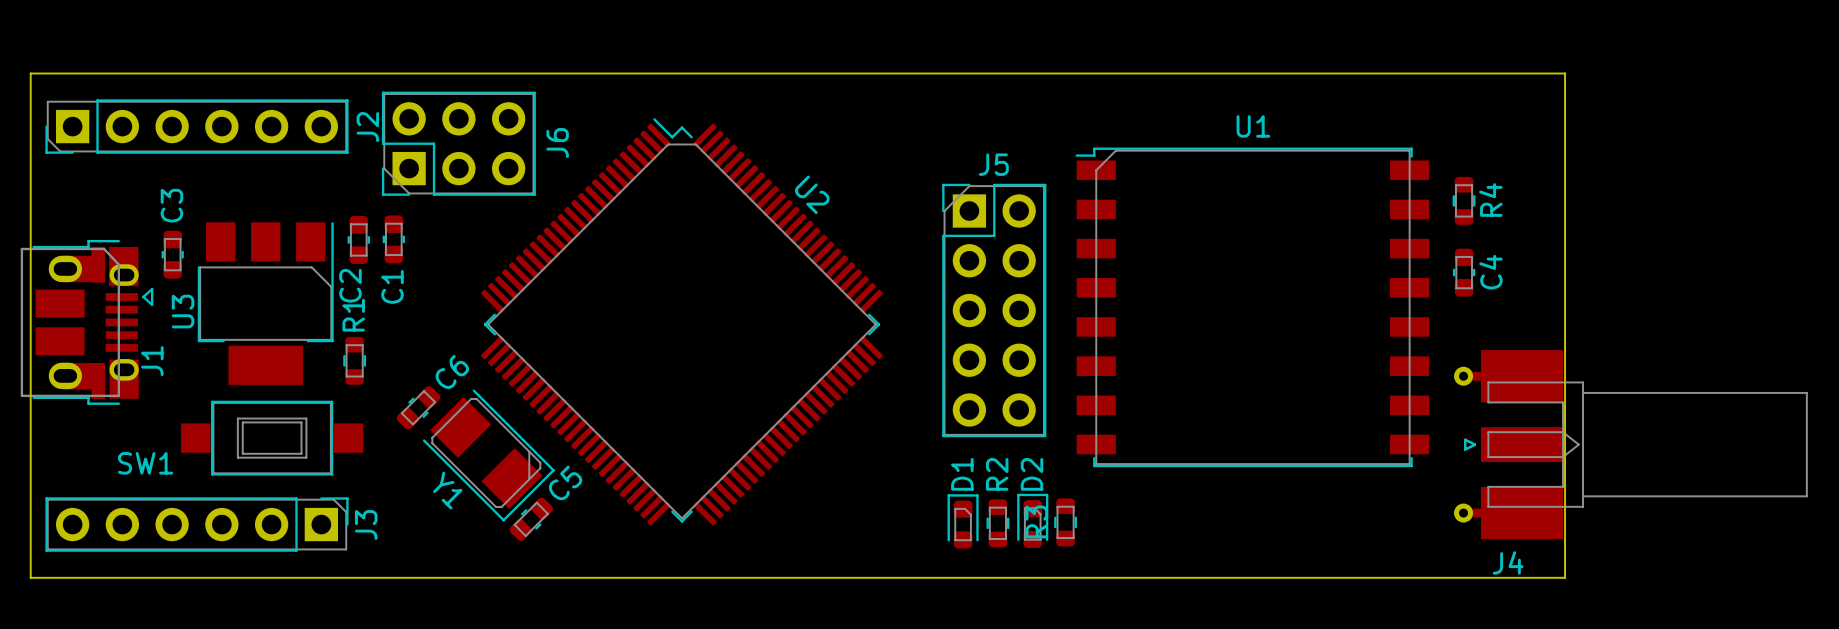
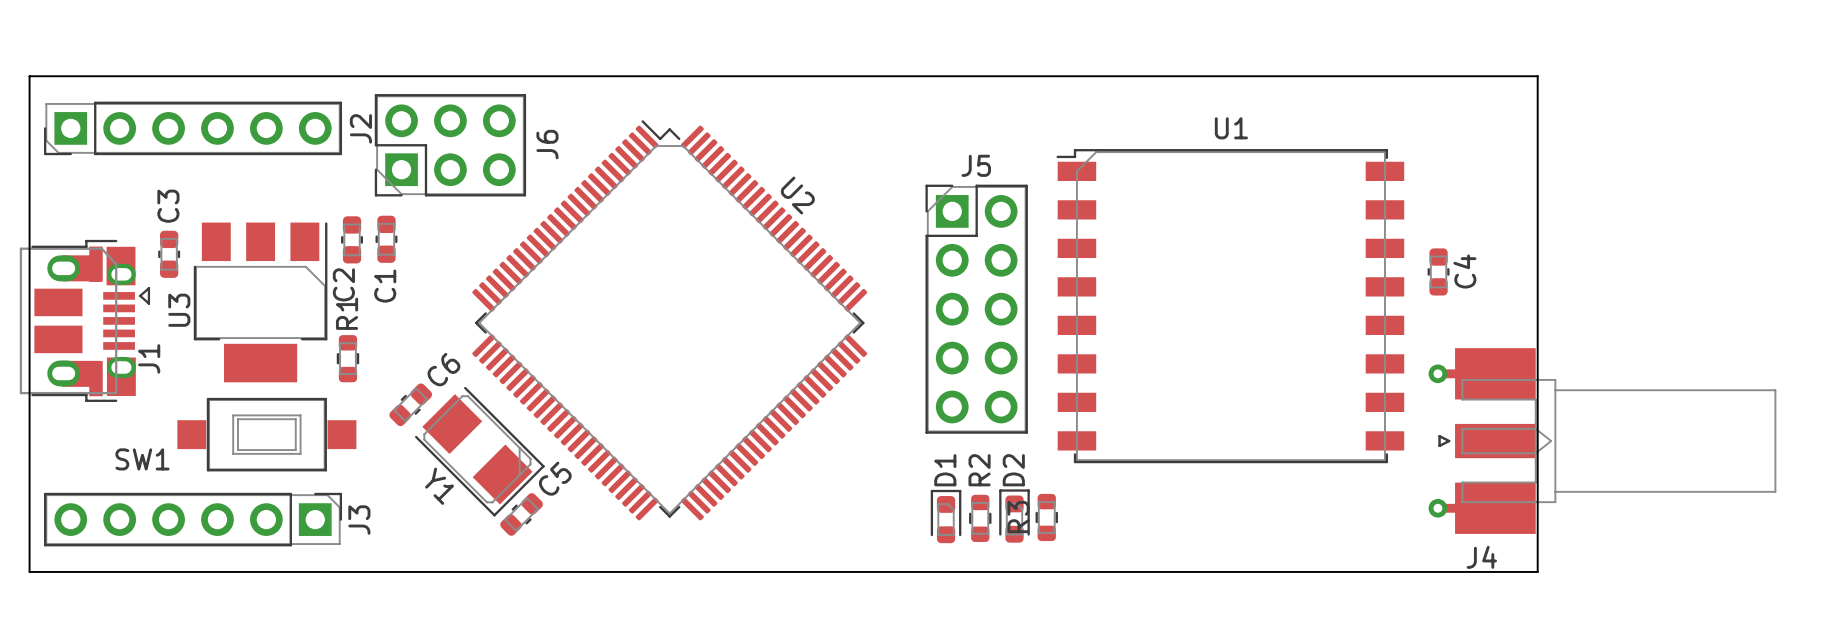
R4: (1464, 200) -> none

